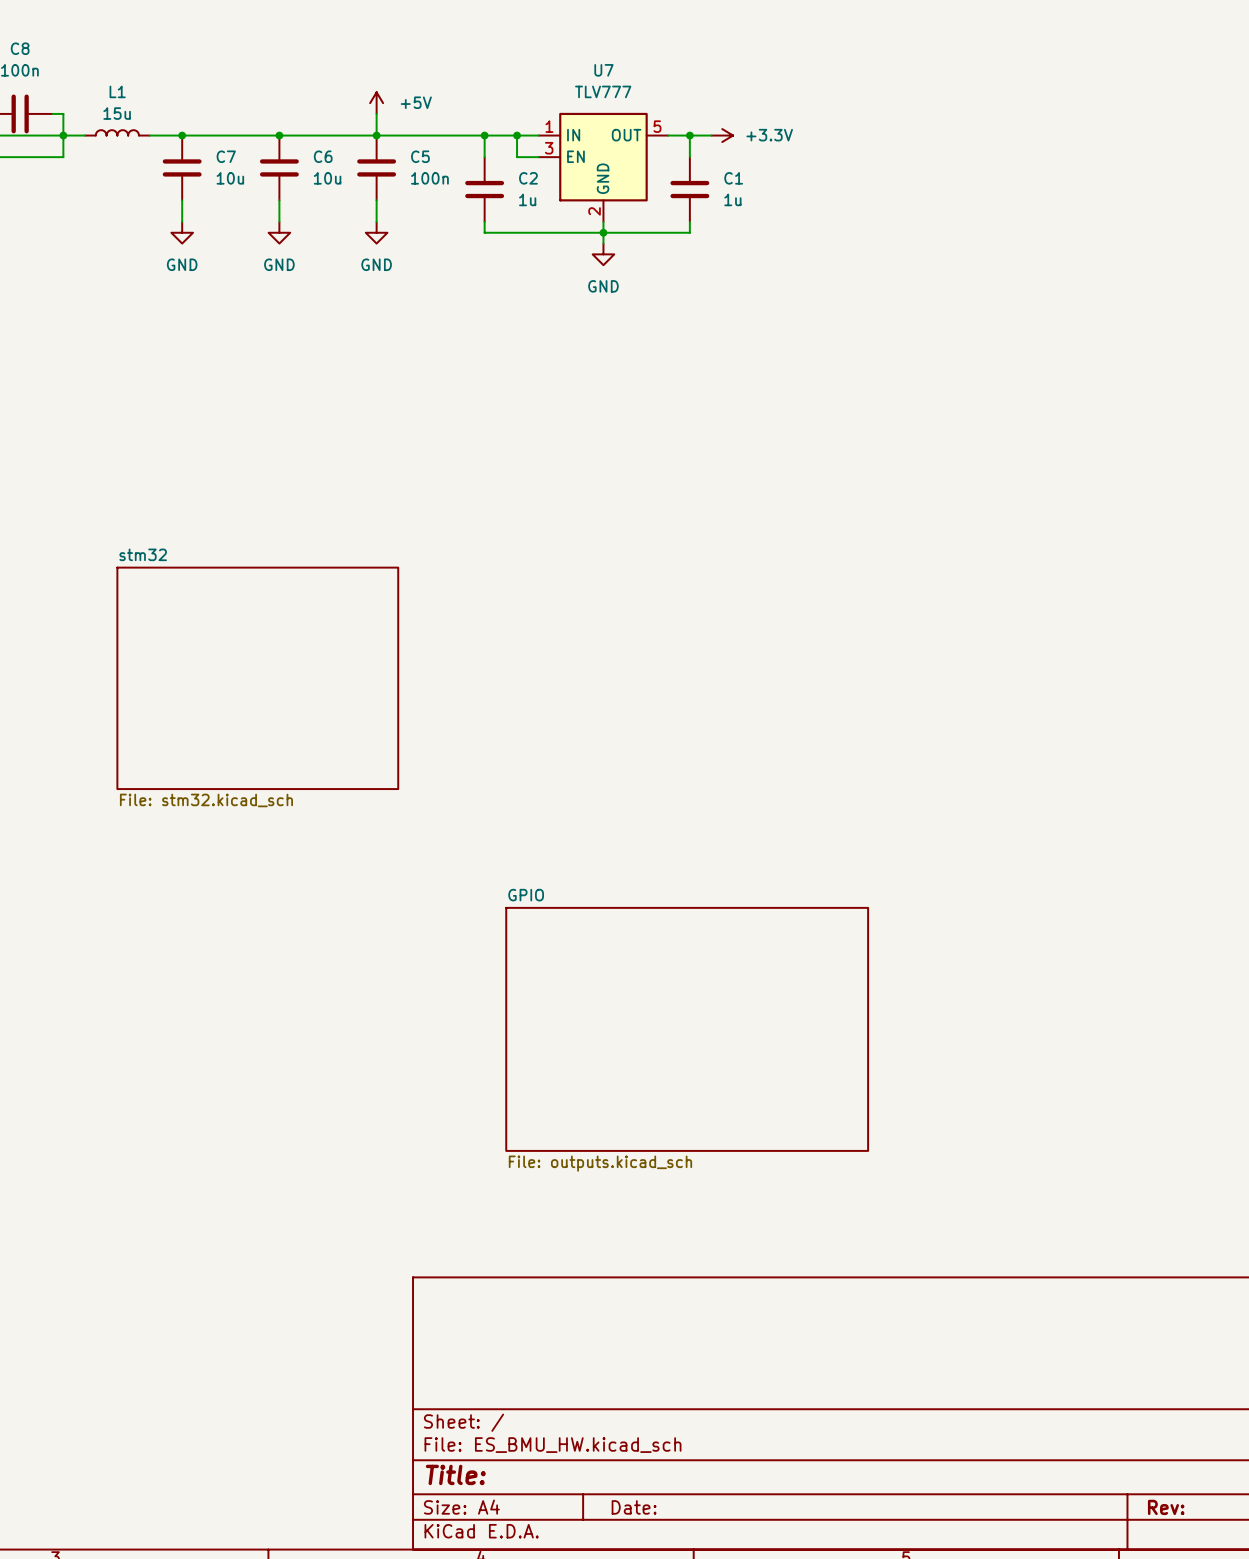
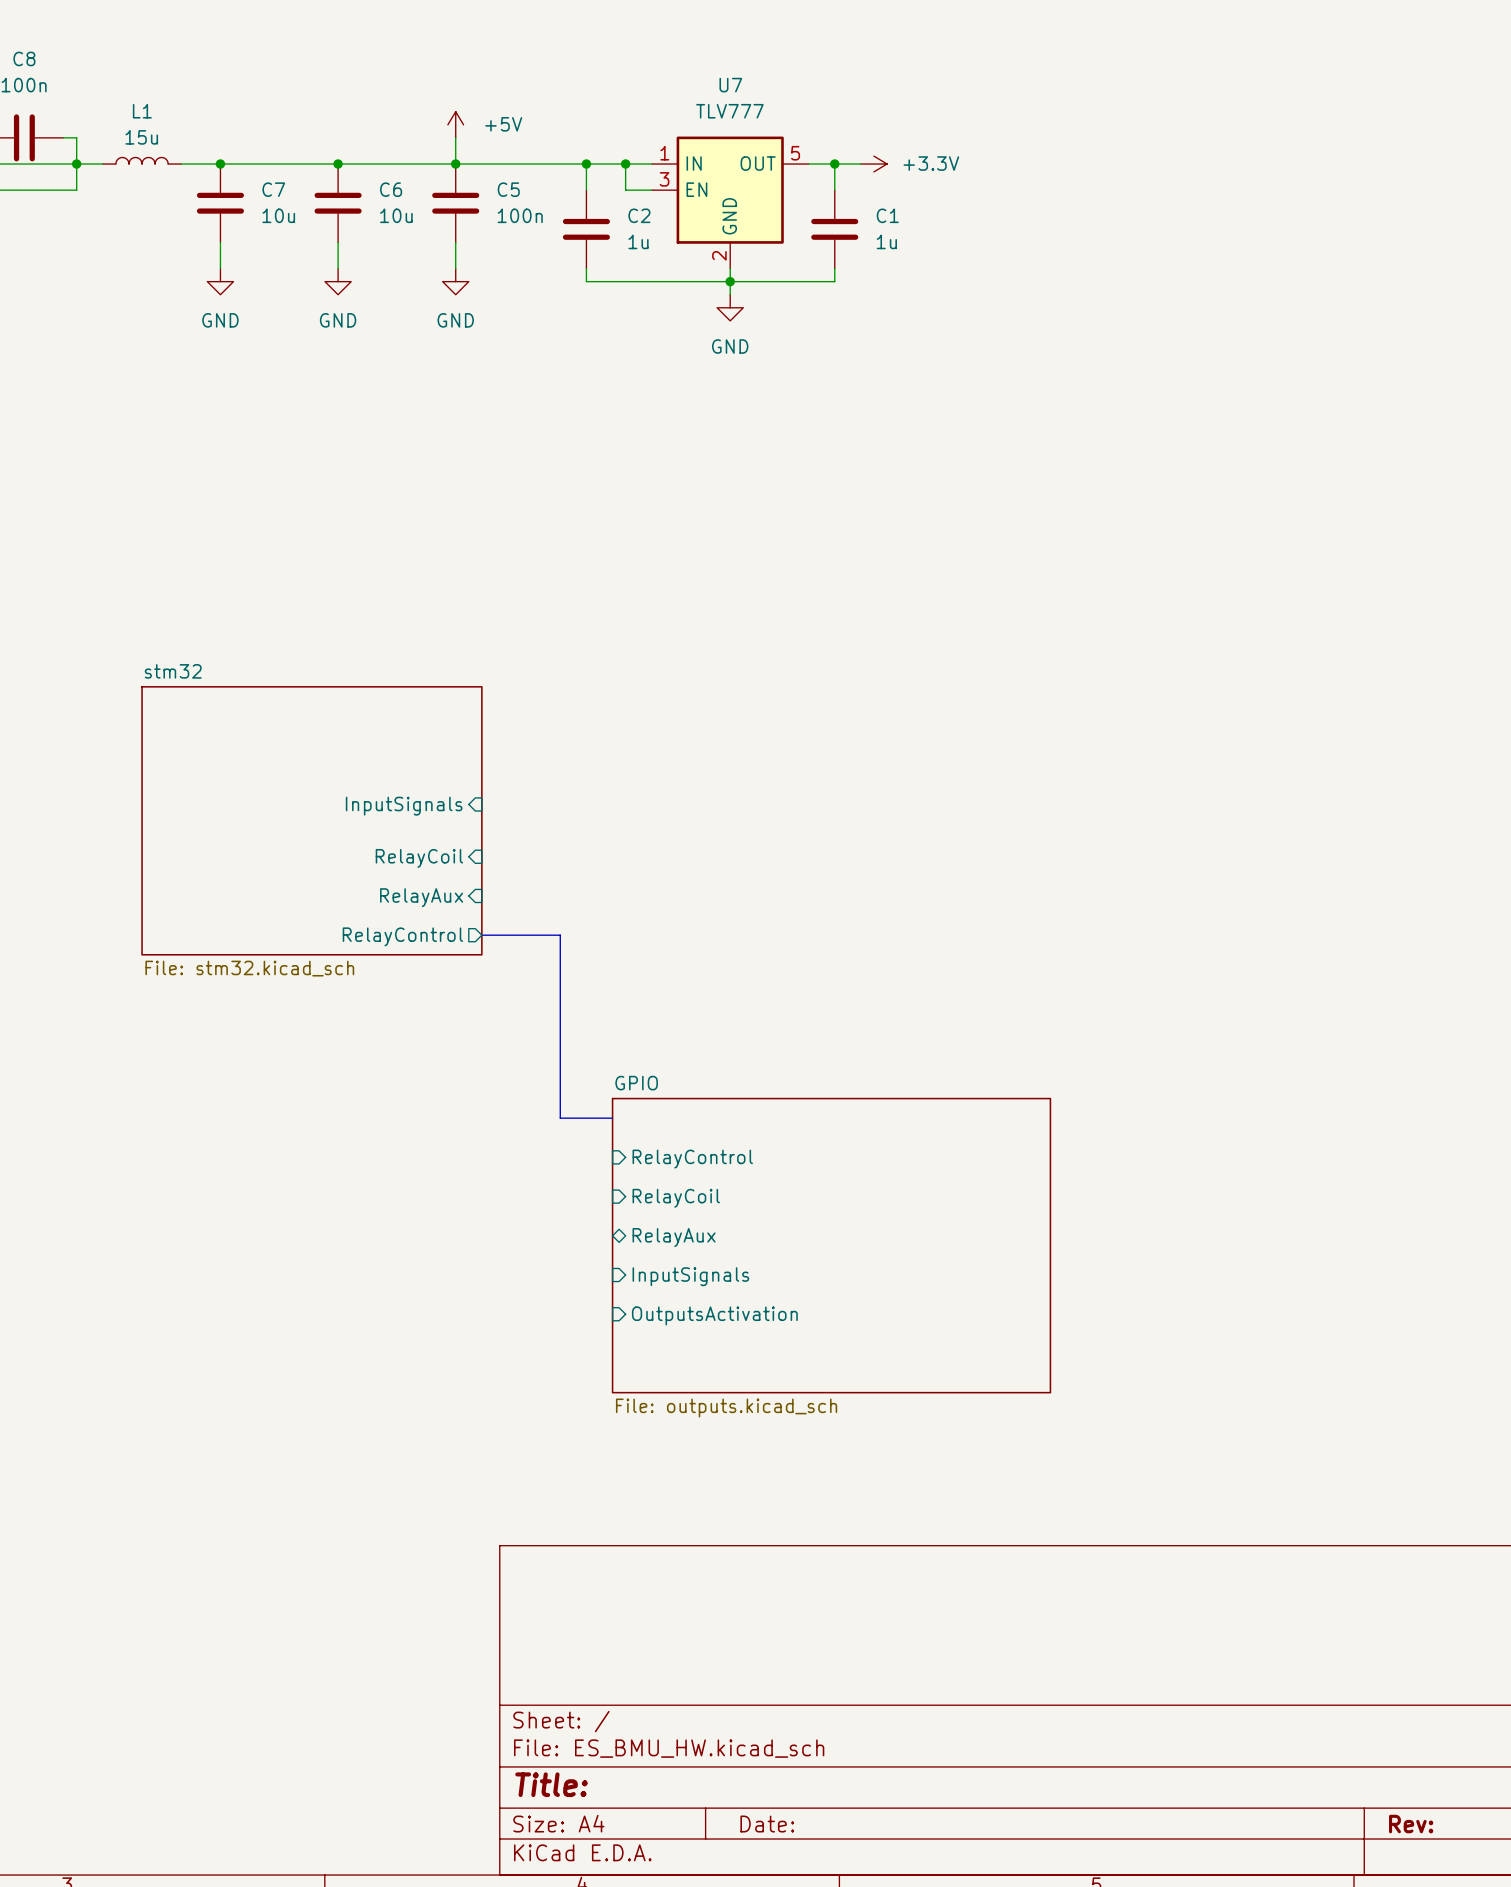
sheet pin: none -> InputSignals (404, 806)
sheet pin: none -> RelayCoil (419, 858)
sheet pin: none -> RelayAux (421, 897)
bus: none -> (481, 935) (560, 935) (560, 1118) (612, 1118)
sheet pin: none -> RelayControl (402, 936)
sheet pin: none -> RelayControl (692, 1159)
sheet pin: none -> RelayCoil (676, 1198)
sheet pin: none -> RelayAux (674, 1237)
sheet pin: none -> InputSignals (690, 1276)
sheet pin: none -> OutputsActivation (714, 1315)

